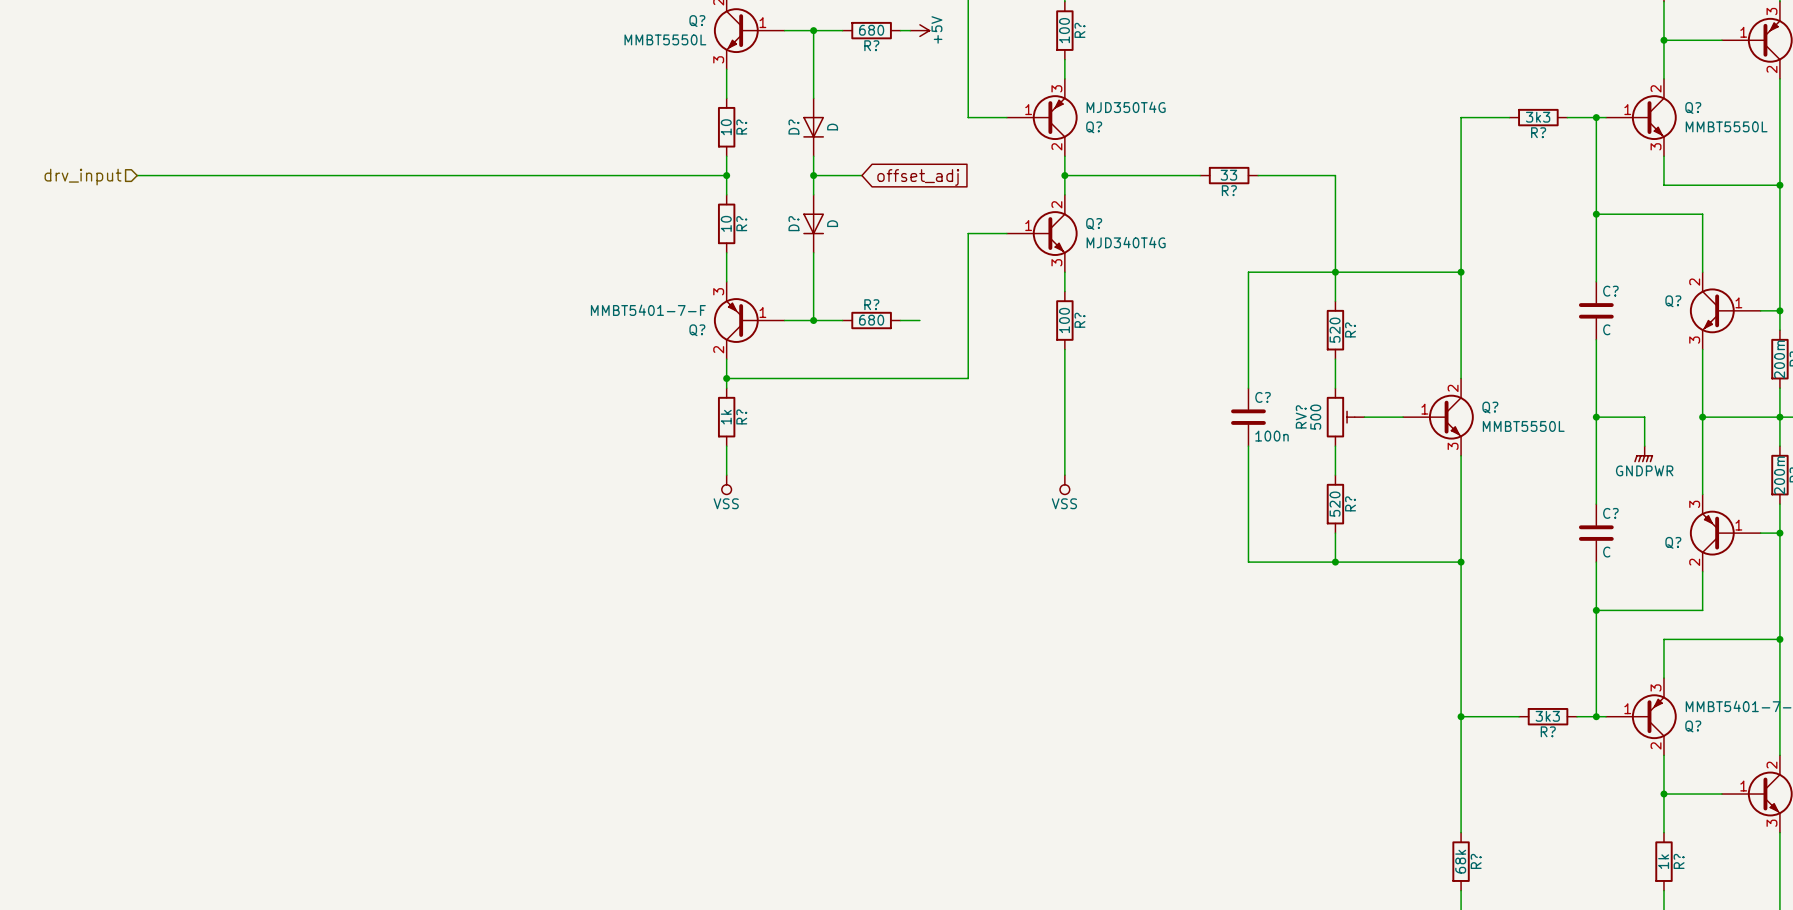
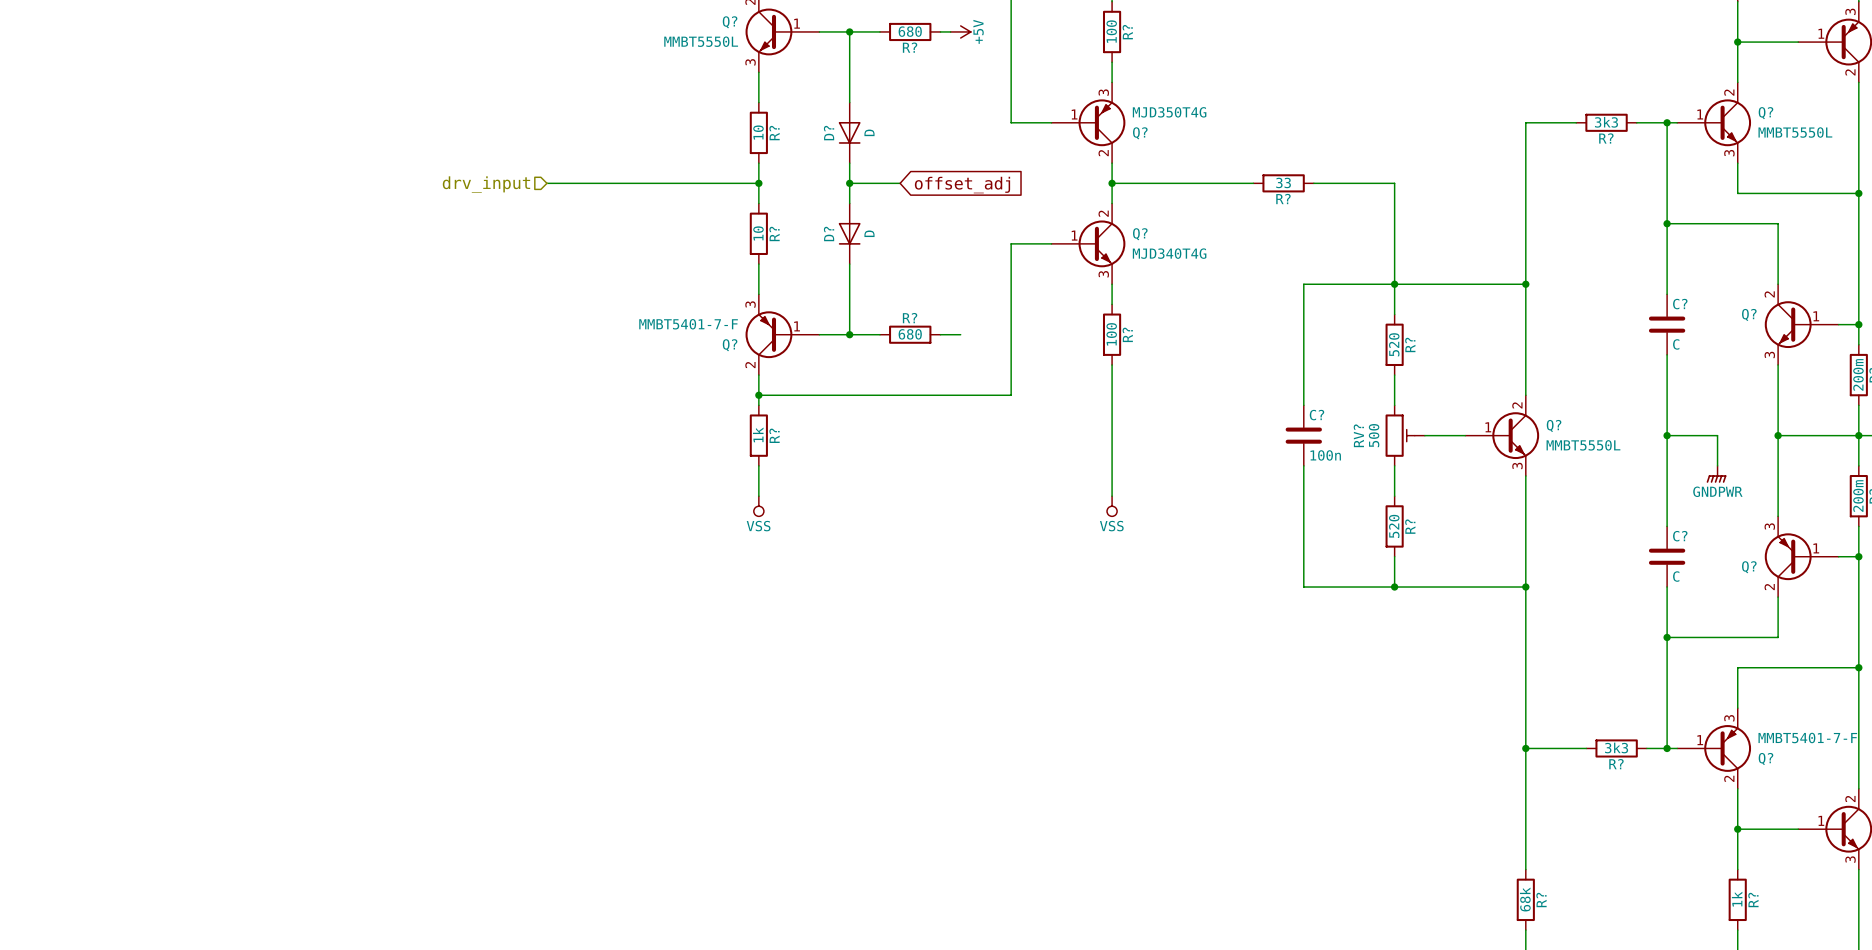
wire: (137, 175) (523, 175) -> none
hierarchical label: drv_input (83, 177) -> none
hierarchical label: none -> drv_input (486, 184)

